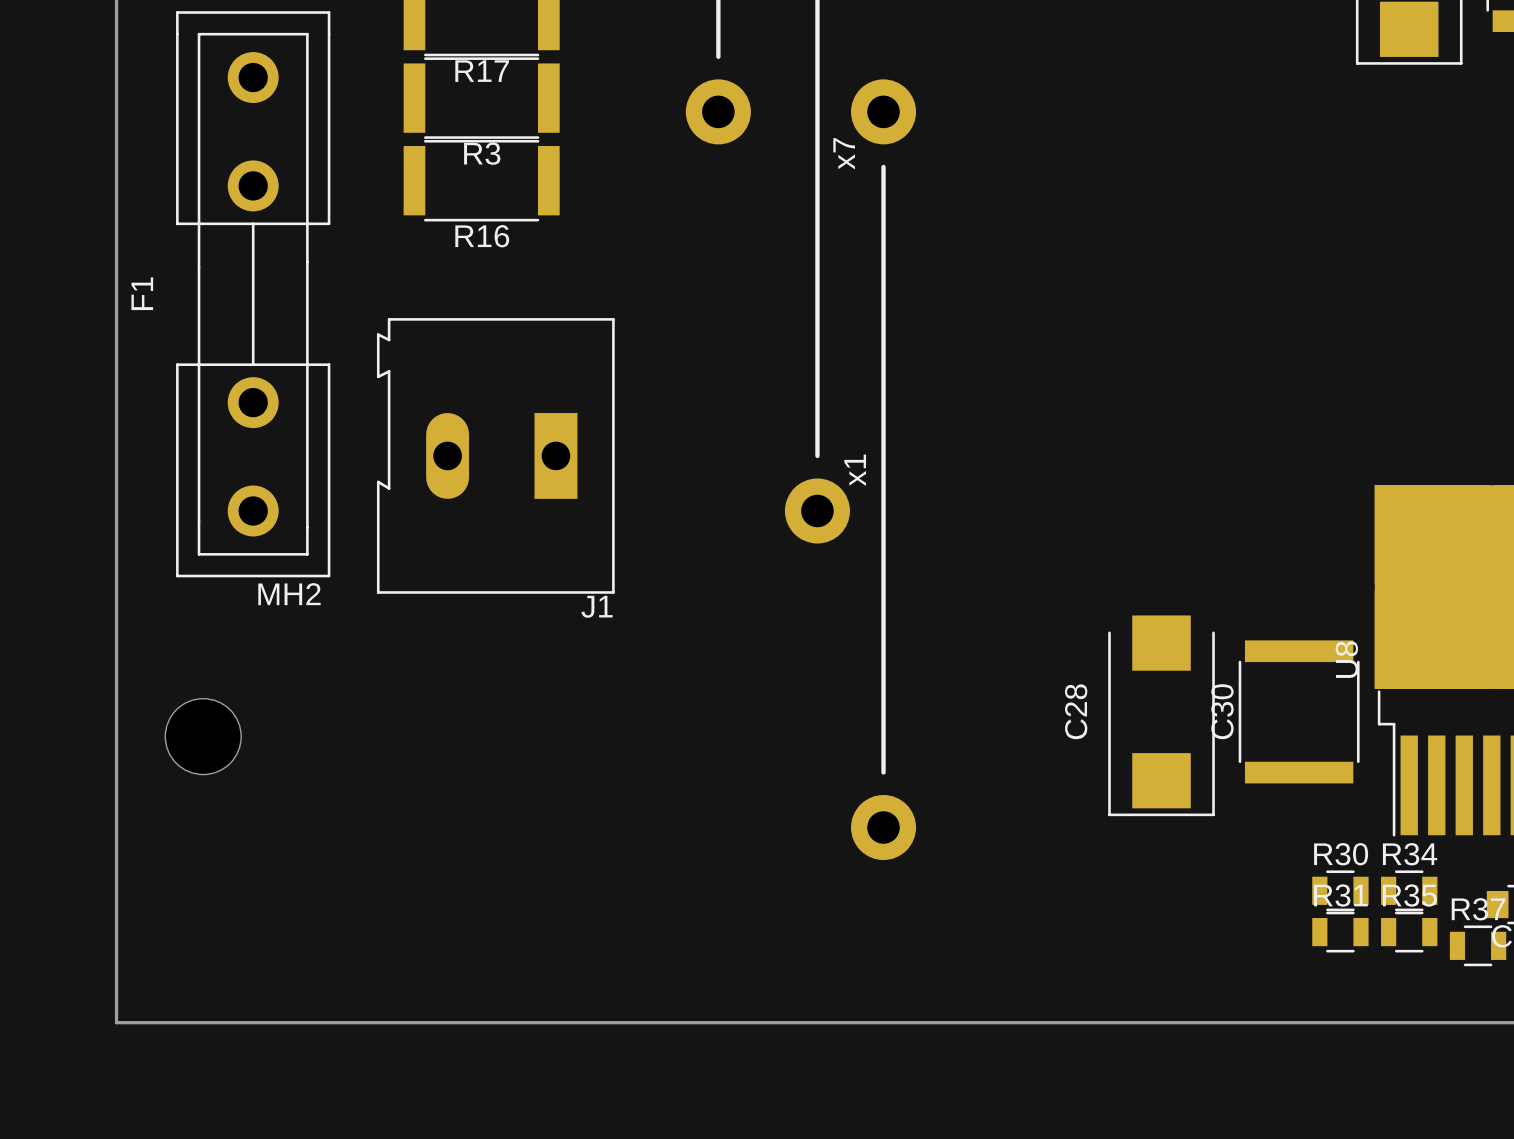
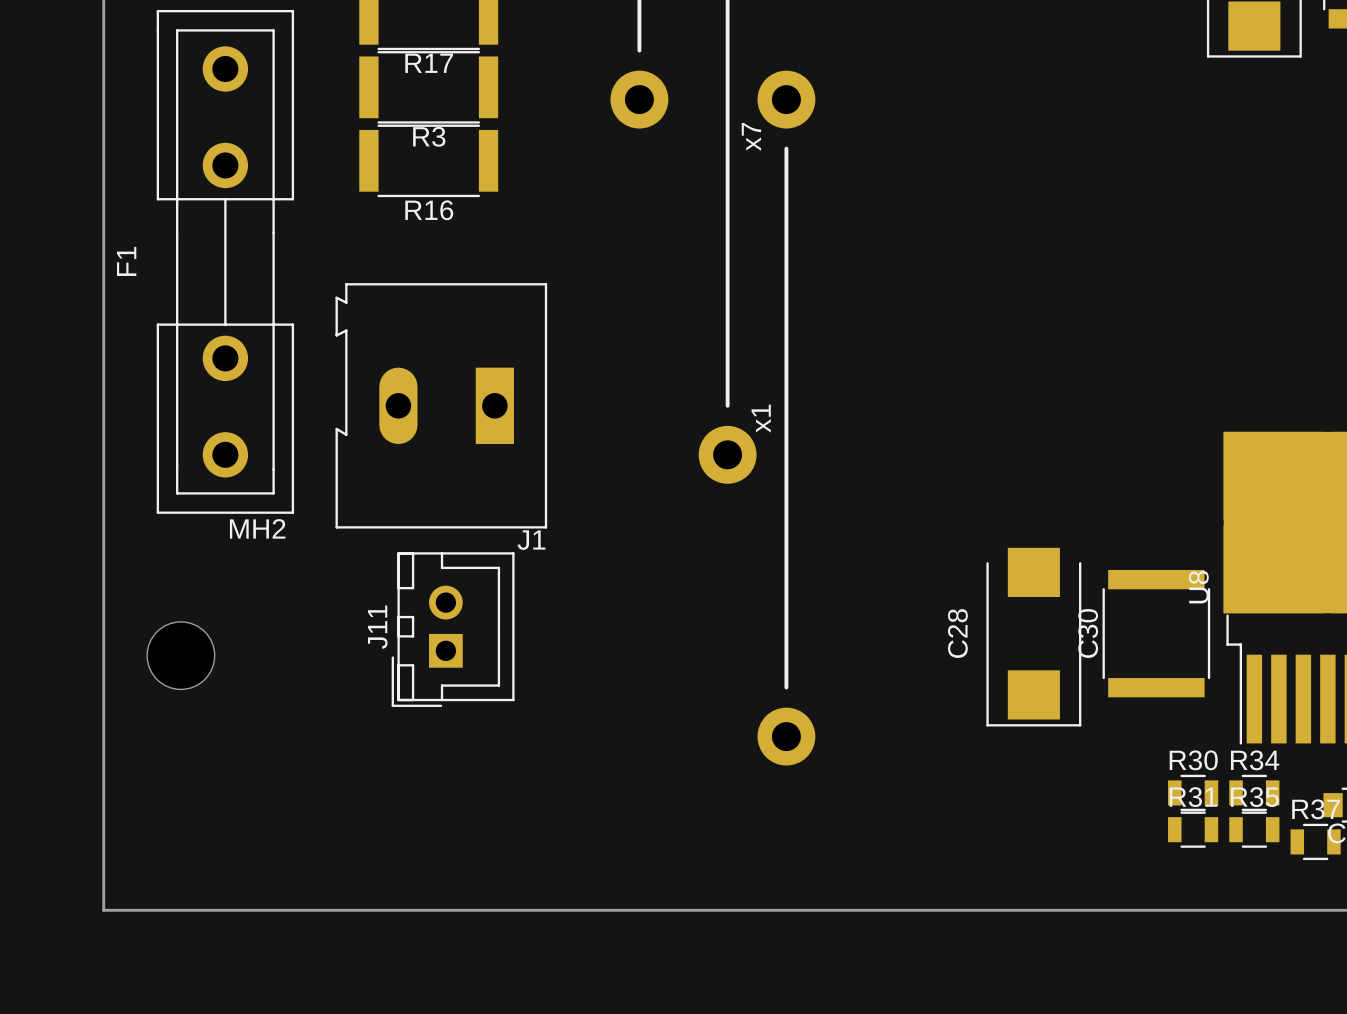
J11: none -> (453, 629)

